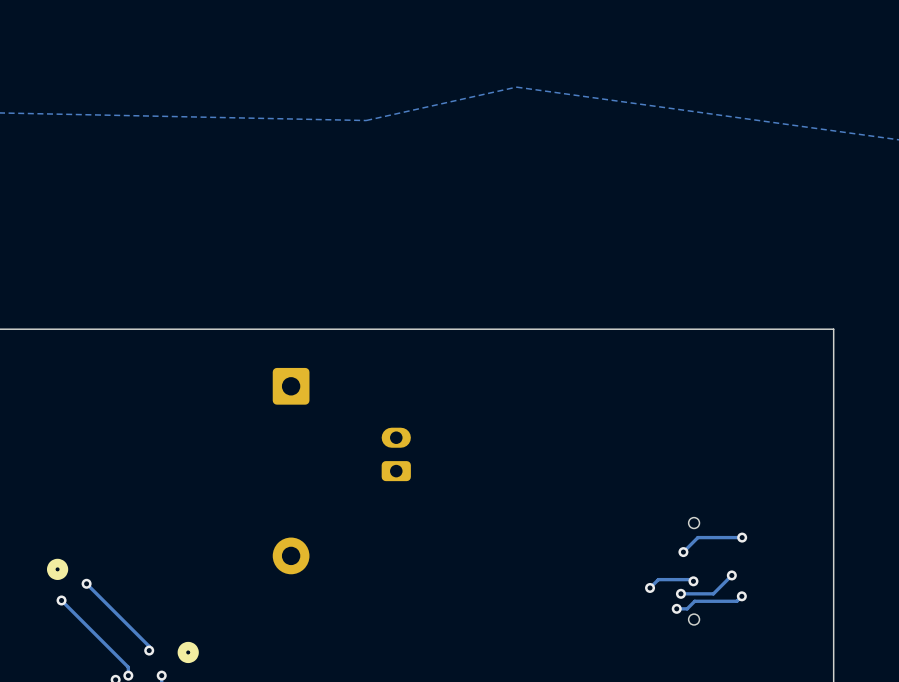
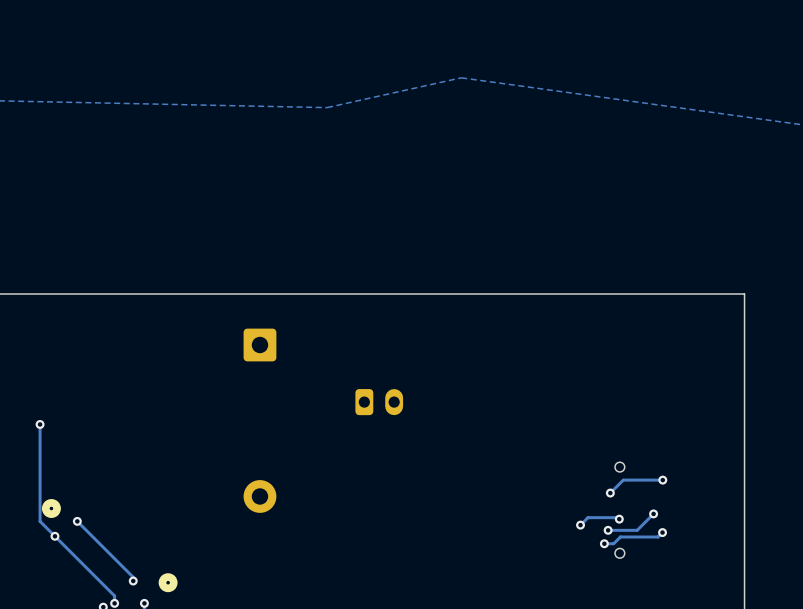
part rotation: 0° (396, 454) -> 90° clockwise (379, 402)
track: none -> (40, 424) (40, 521) (54, 536)
via: none -> (40, 424)

